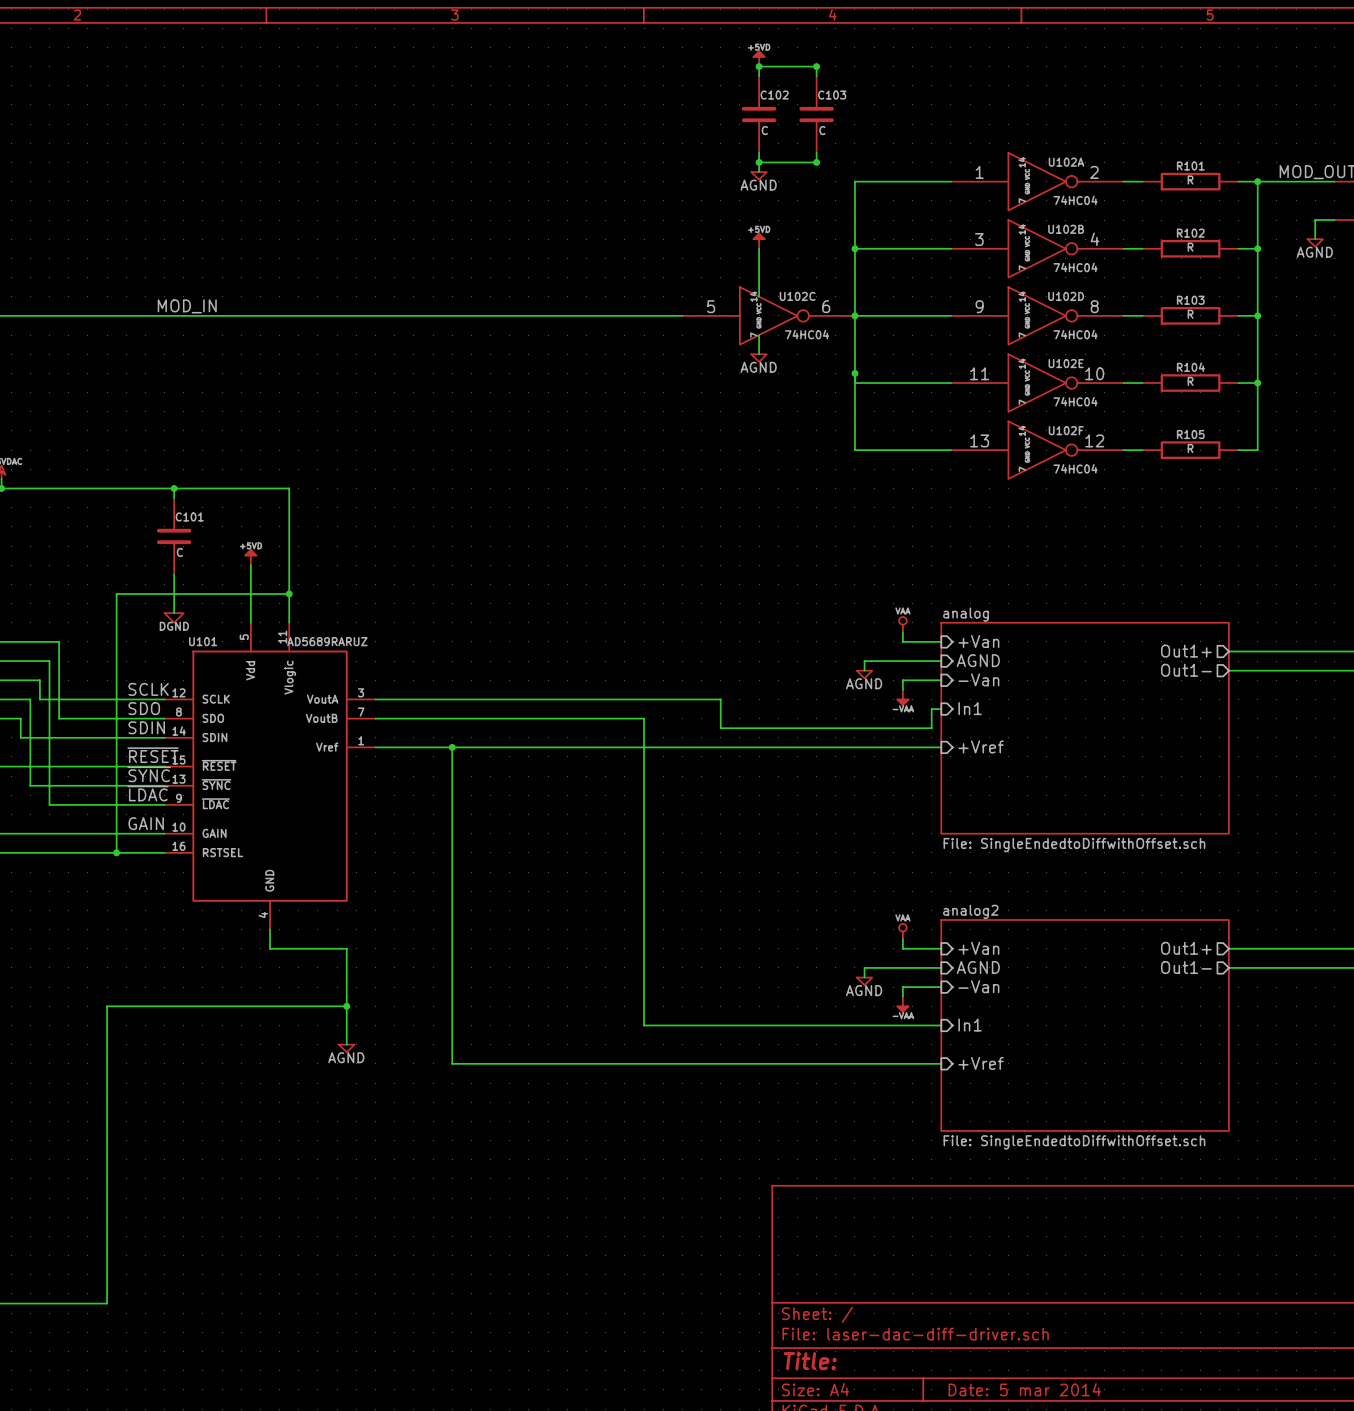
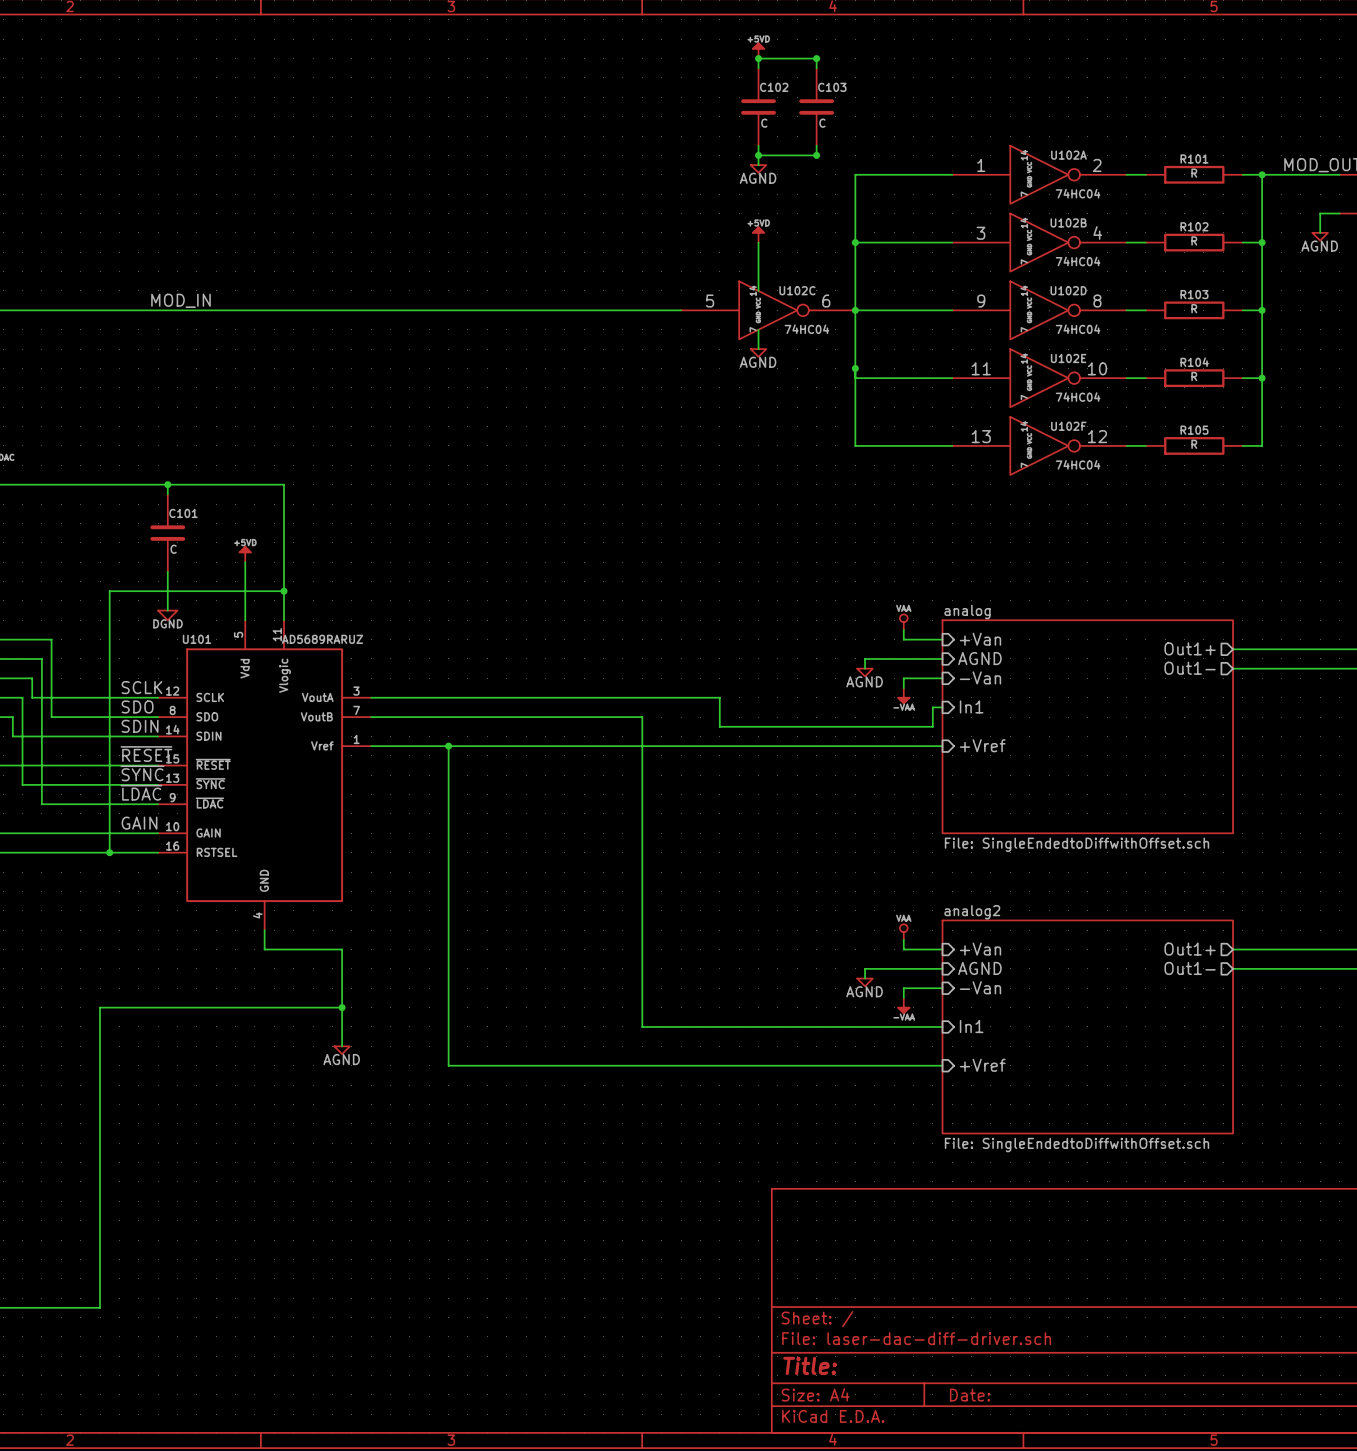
title block: Date: 5 mar 2014 (1024, 1389) -> Date: (970, 1395)

